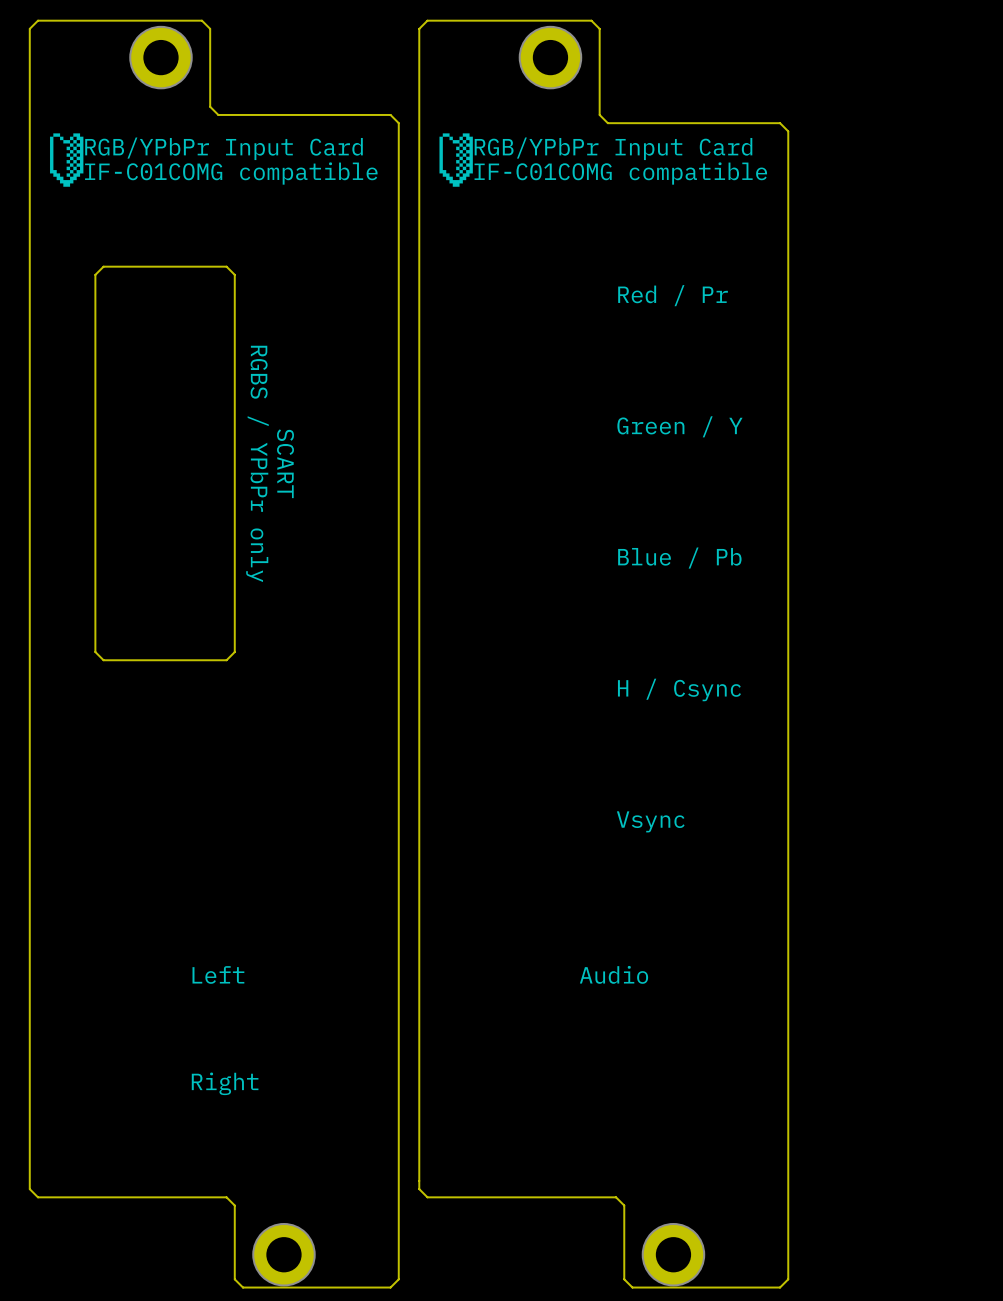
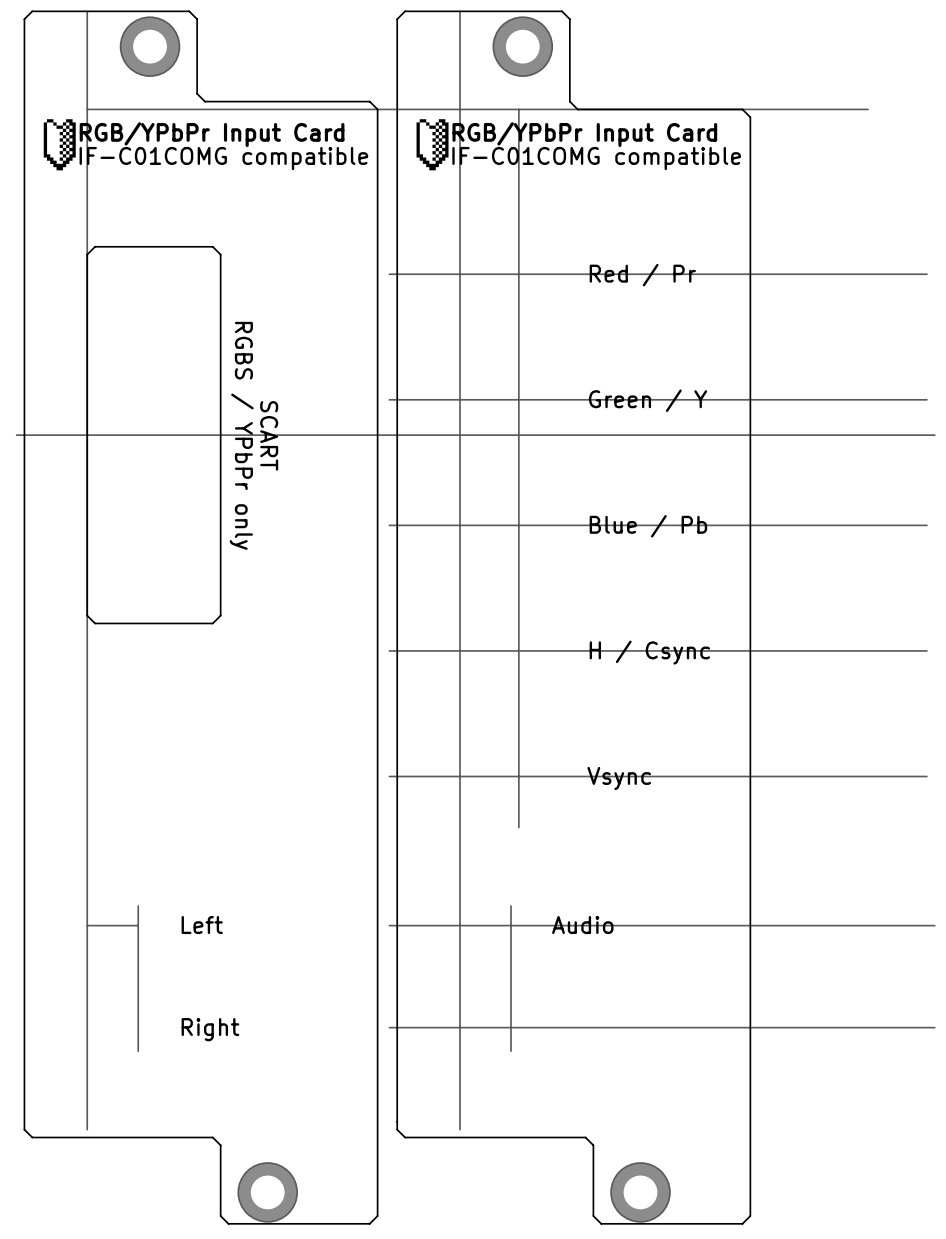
line: none -> (87, 11) (87, 1129)
line: none -> (460, 11) (460, 1129)
line: none -> (87, 109) (868, 109)
line: none -> (518, 109) (518, 827)
line: none -> (389, 274) (926, 274)
line: none -> (389, 399) (926, 399)
line: none -> (16, 435) (934, 435)
line: none -> (389, 525) (926, 525)
line: none -> (389, 650) (926, 650)
line: none -> (389, 776) (926, 776)
line: none -> (138, 905) (138, 1051)
line: none -> (511, 905) (511, 1051)
line: none -> (87, 925) (138, 925)
line: none -> (389, 925) (934, 925)
line: none -> (389, 1027) (934, 1027)

